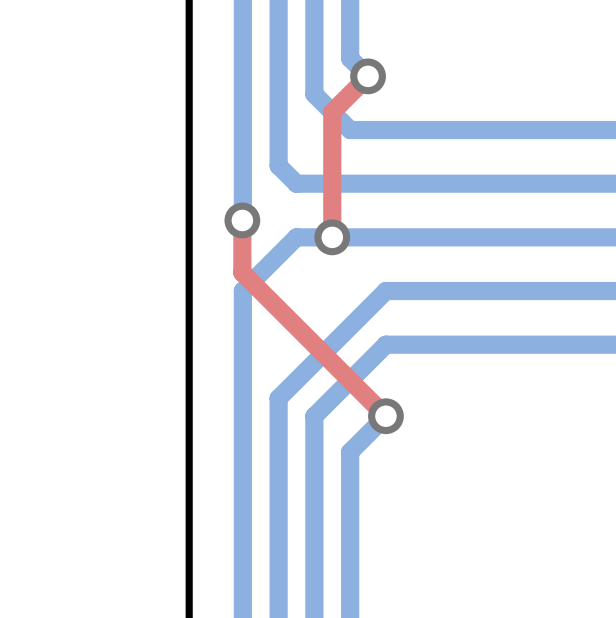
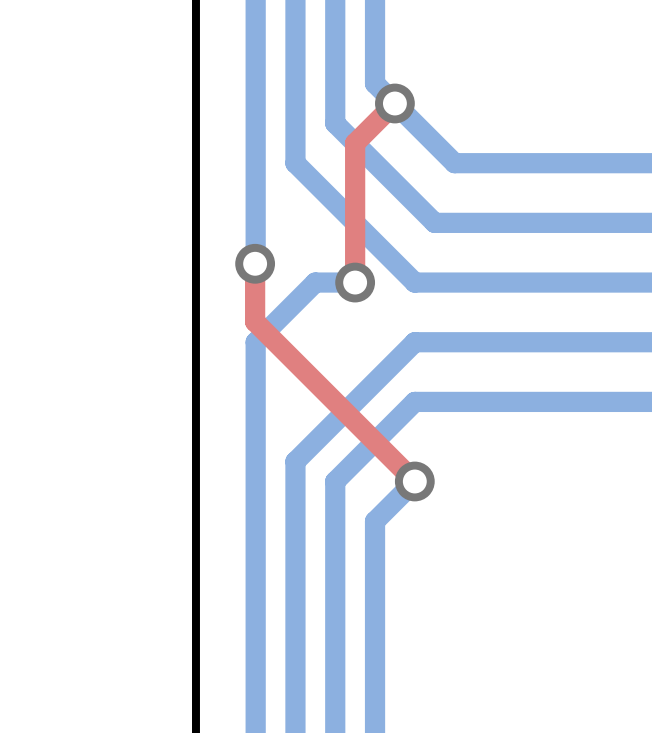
bottom track: (278, 130) (278, 165) (296, 183) (403, 183) -> (295, 163) (414, 282)
bottom track: (350, 130) (421, 130) -> (394, 103) (454, 163)
bottom track: none -> (375, 163) (434, 222)
bottom track: (332, 237) (385, 237) -> none

